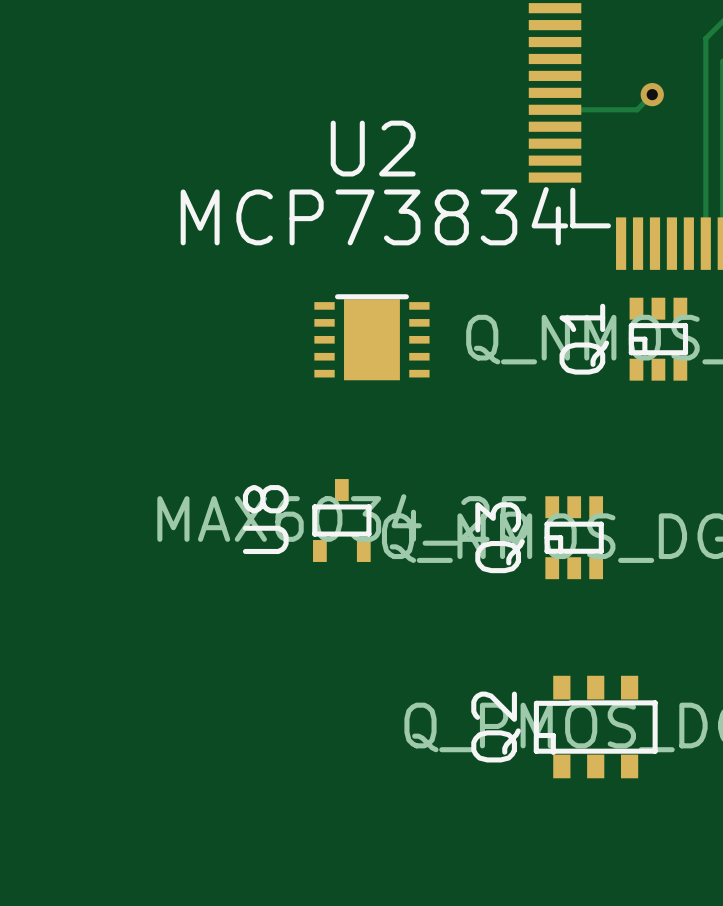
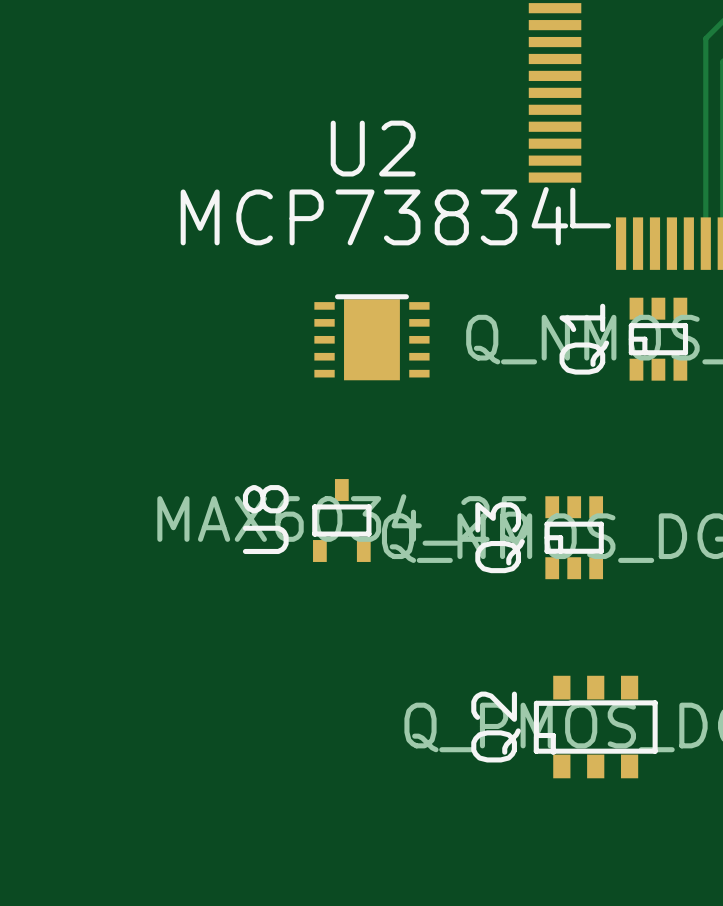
track: (652, 94) (637, 109) (555, 109) -> none
via: (652, 94) -> none

